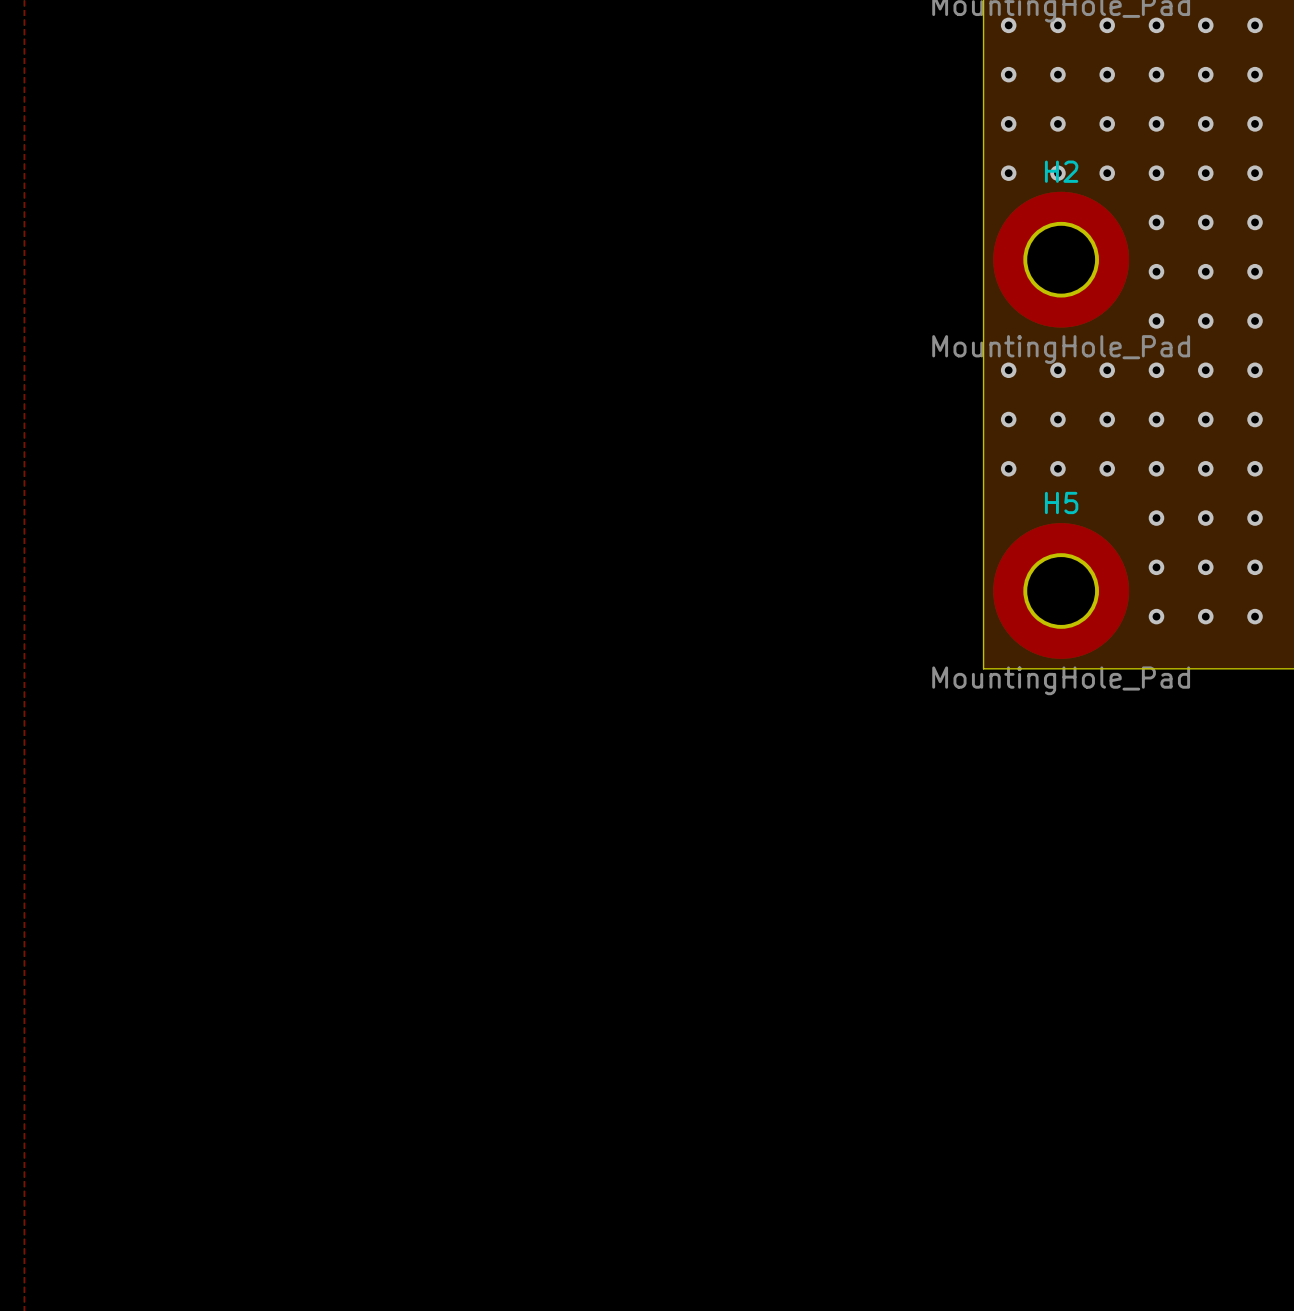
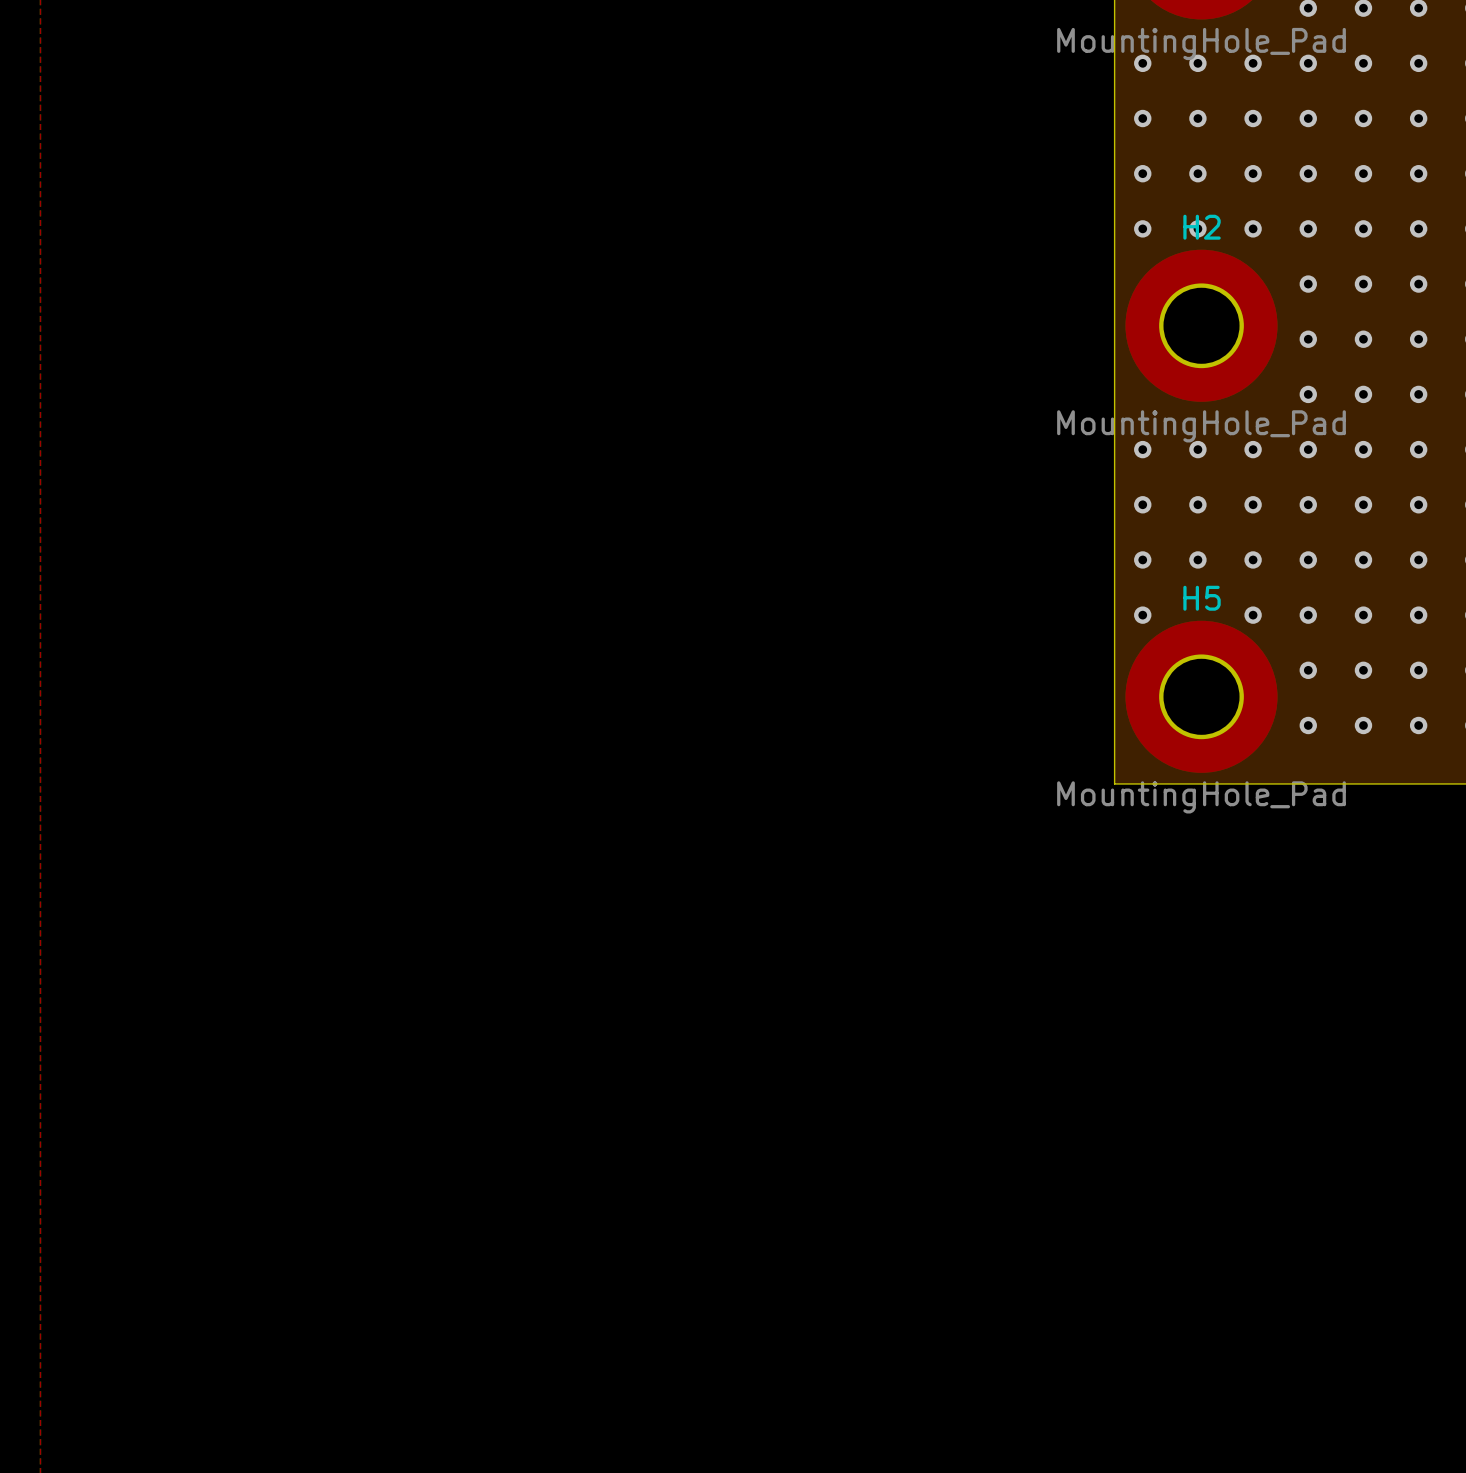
via: none -> (1142, 615)
via: none -> (1253, 615)

